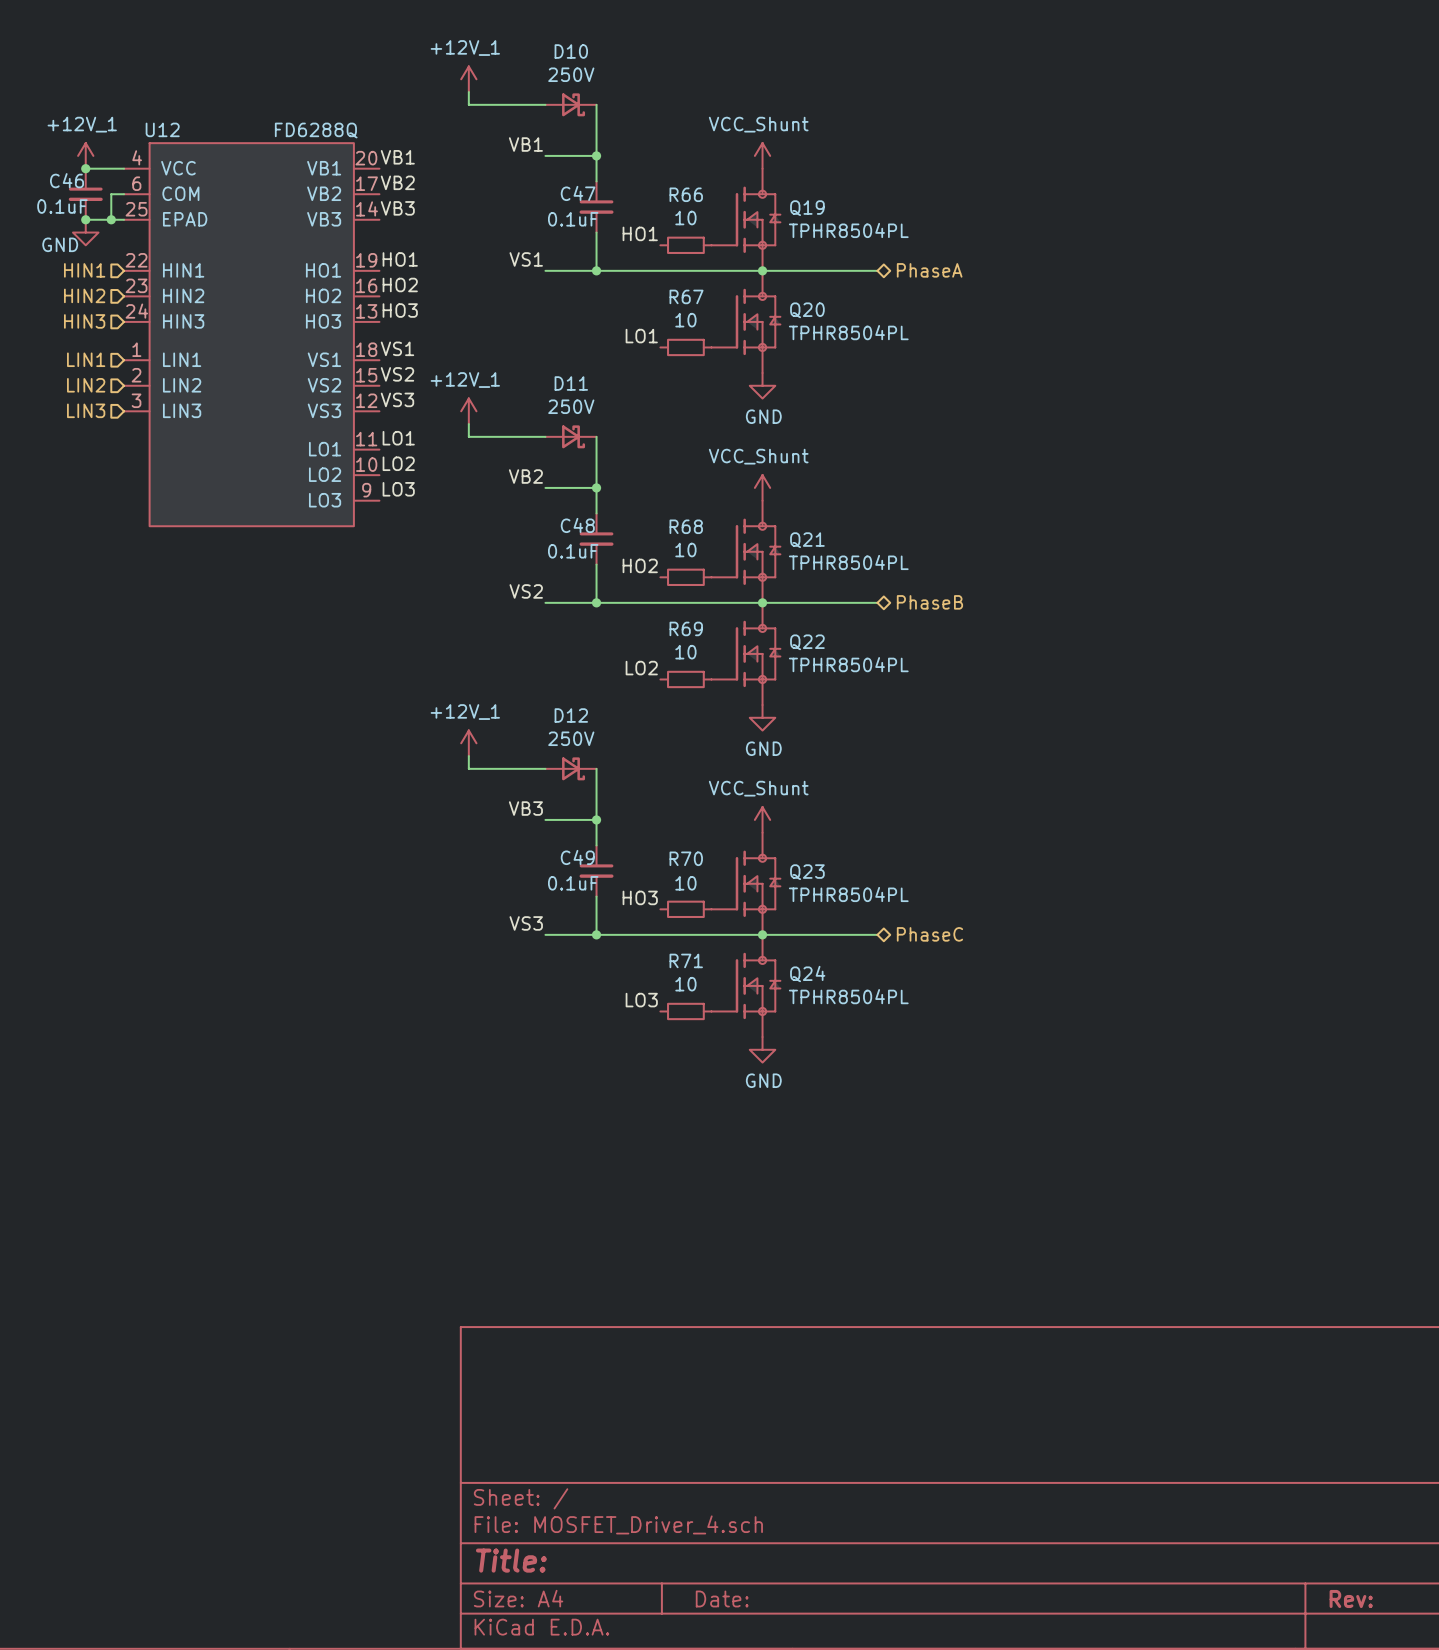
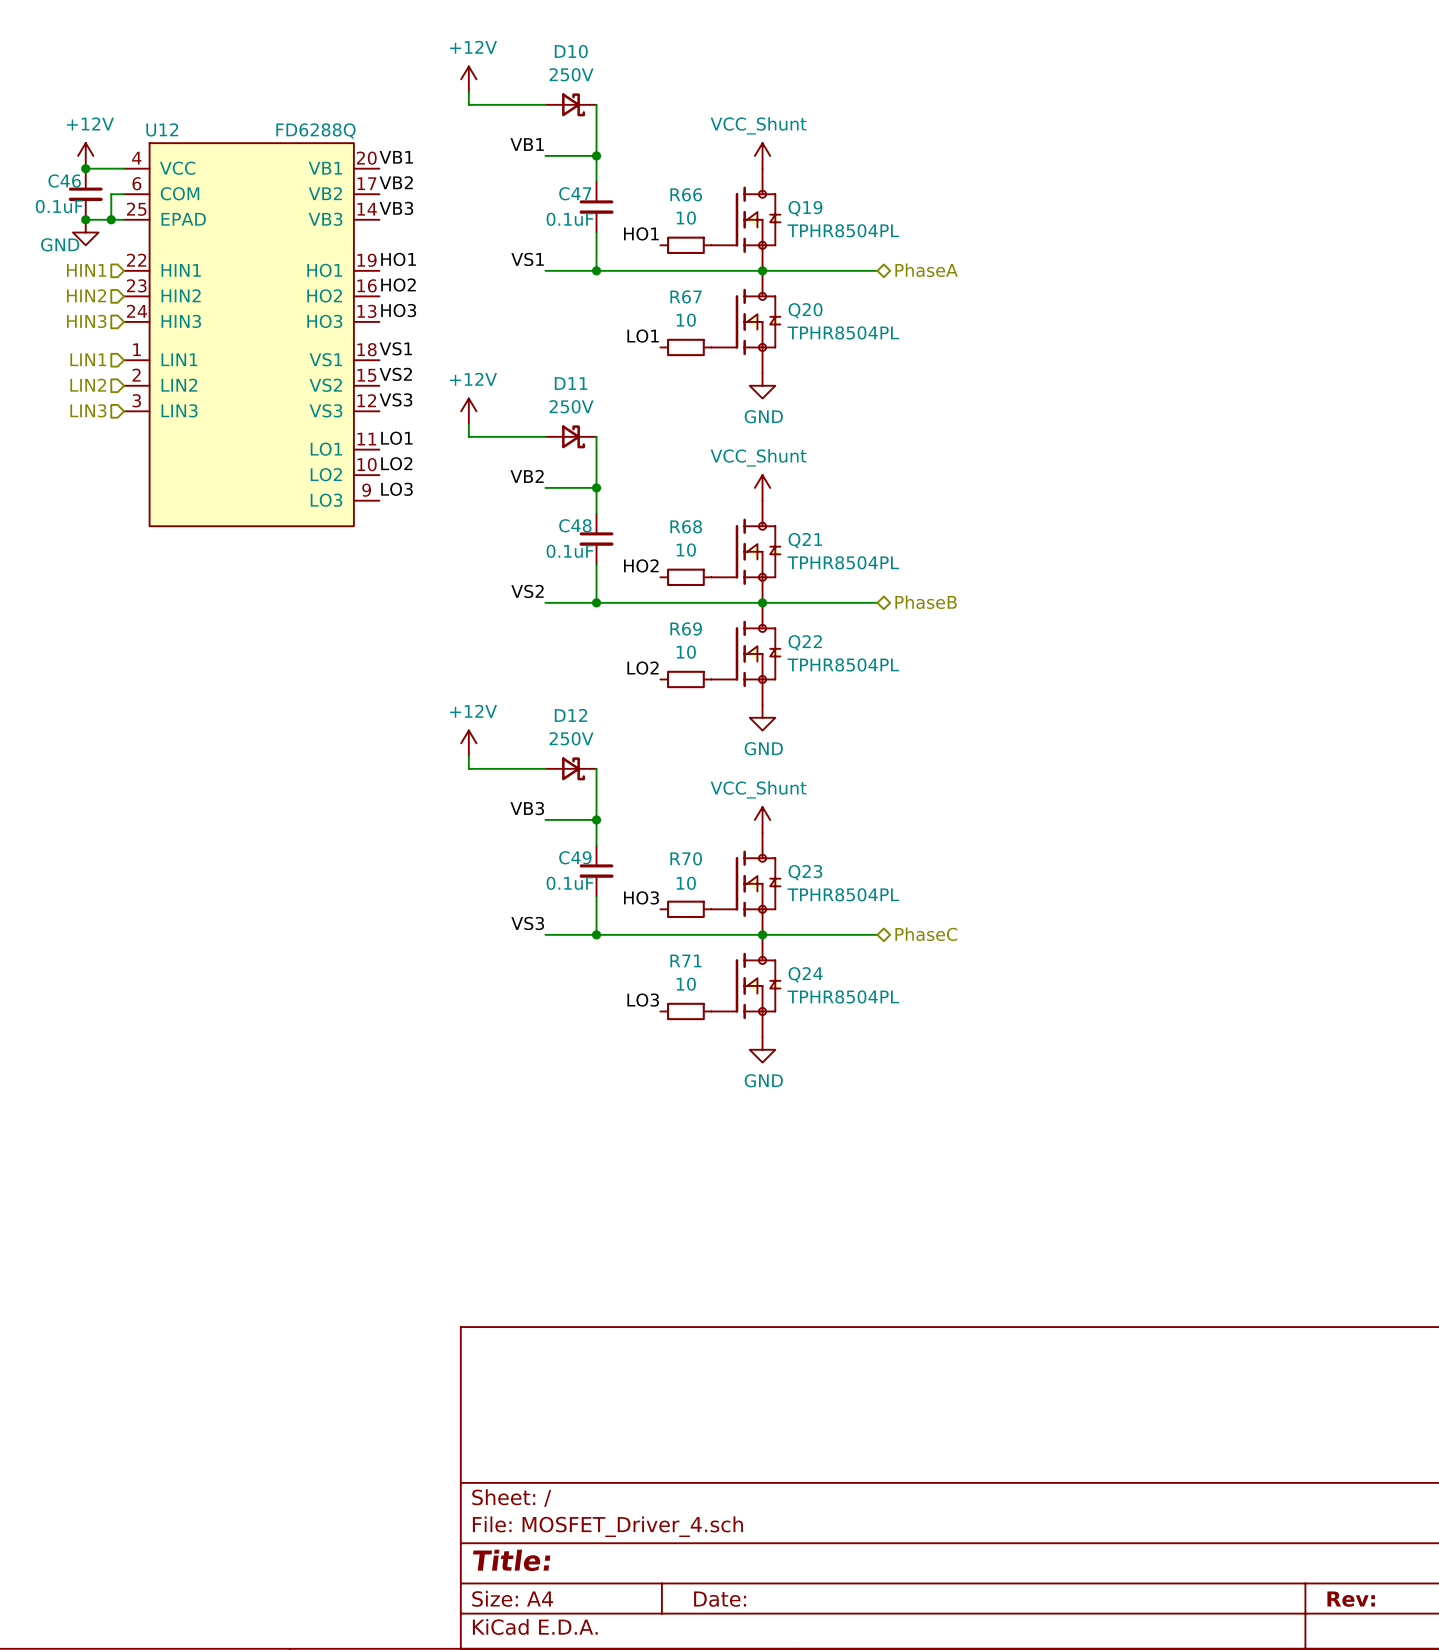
power symbol: +12V_1 (468, 79) -> +12V (468, 79)
power symbol: +12V_1 (85, 155) -> +12V (85, 155)
power symbol: +12V_1 (468, 411) -> +12V (468, 411)
power symbol: +12V_1 (468, 743) -> +12V (468, 743)

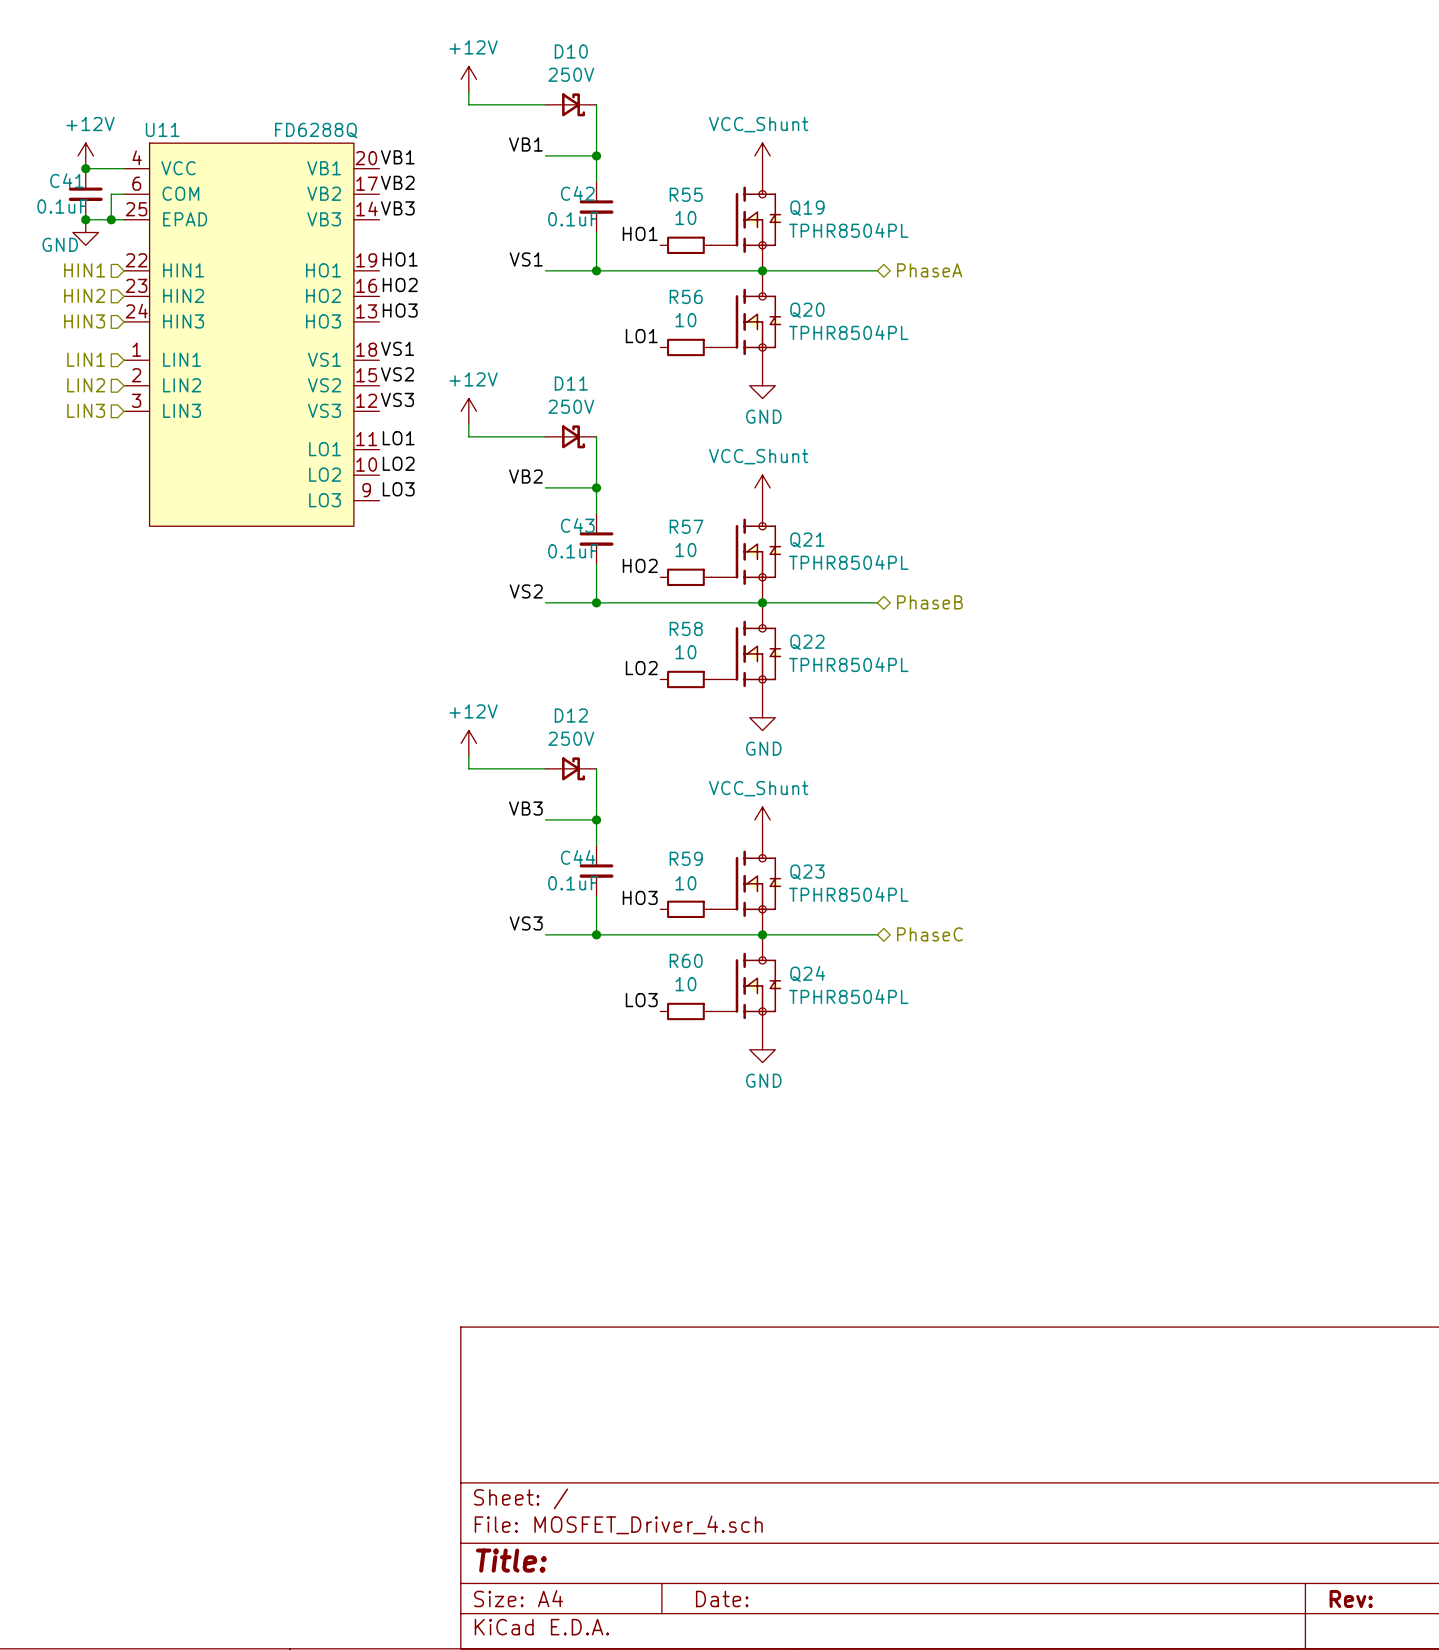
U12 name: U12 (162, 129) -> U11 (162, 129)
C46 name: C46 (64, 180) -> C41 (67, 180)
C47 name: C47 (575, 193) -> C42 (577, 193)
R66 name: R66 (686, 194) -> R55 (686, 194)
R67 name: R67 (686, 296) -> R56 (686, 296)
C48 name: C48 (575, 525) -> C43 (577, 525)
R68 name: R68 (686, 526) -> R57 (686, 526)
R69 name: R69 (686, 628) -> R58 (686, 628)
C49 name: C49 (575, 857) -> C44 (578, 857)
R70 name: R70 (686, 858) -> R59 (686, 858)
R71 name: R71 (685, 960) -> R60 (686, 960)

